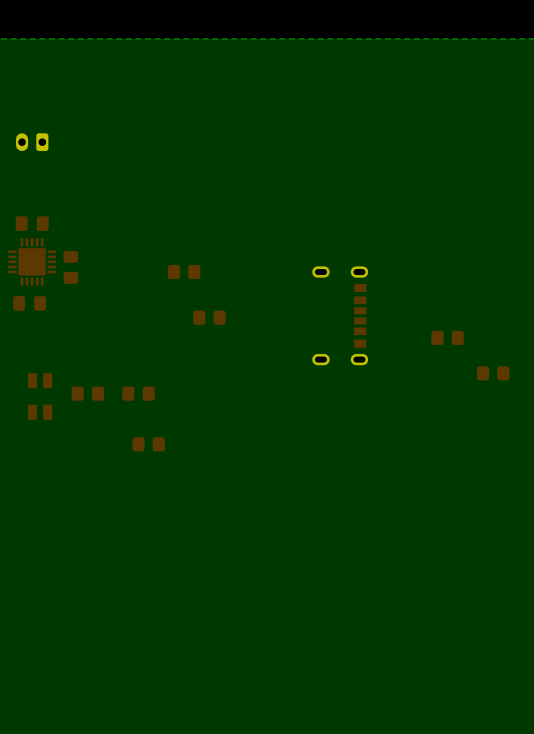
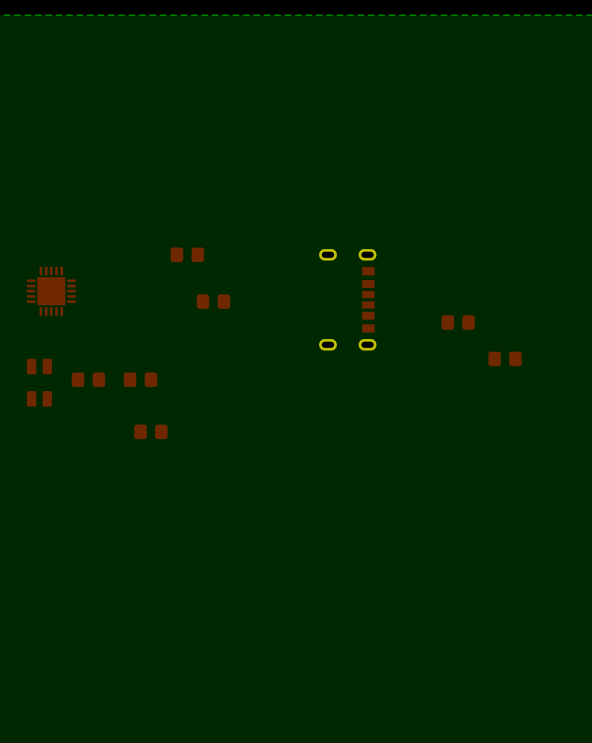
part: (32, 142) -> none
part: (32, 223) -> none
part position: (32, 261) -> (51, 291)
part: (70, 267) -> none
part: (29, 303) -> none

